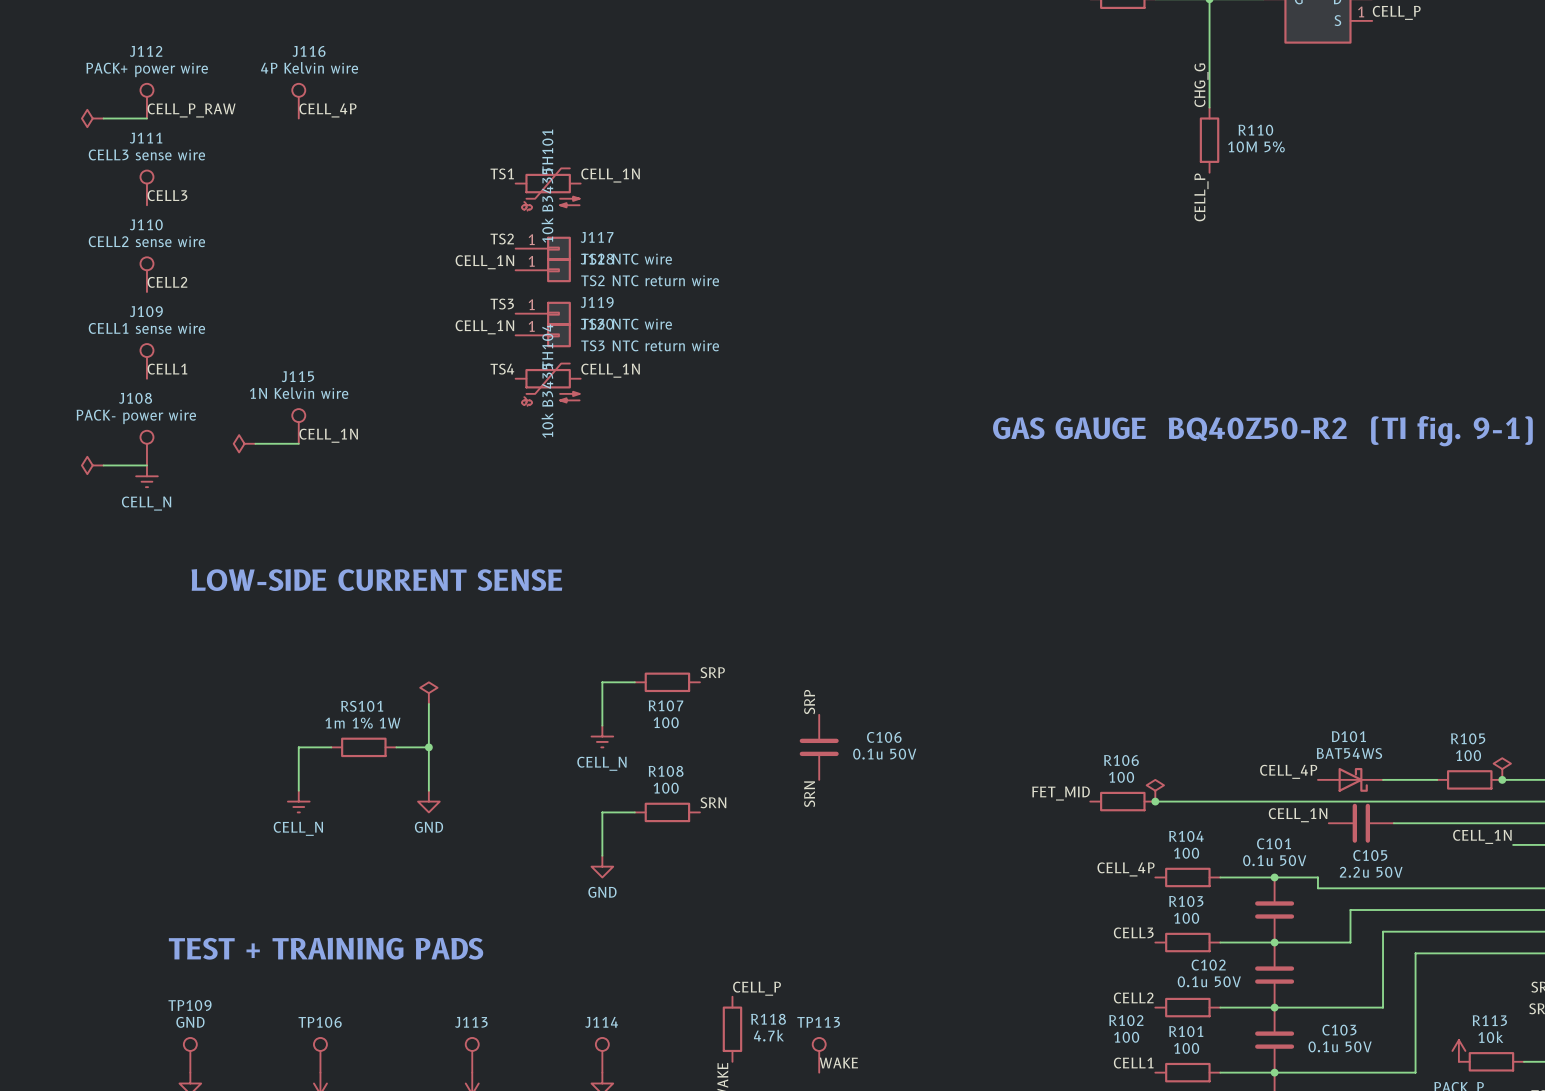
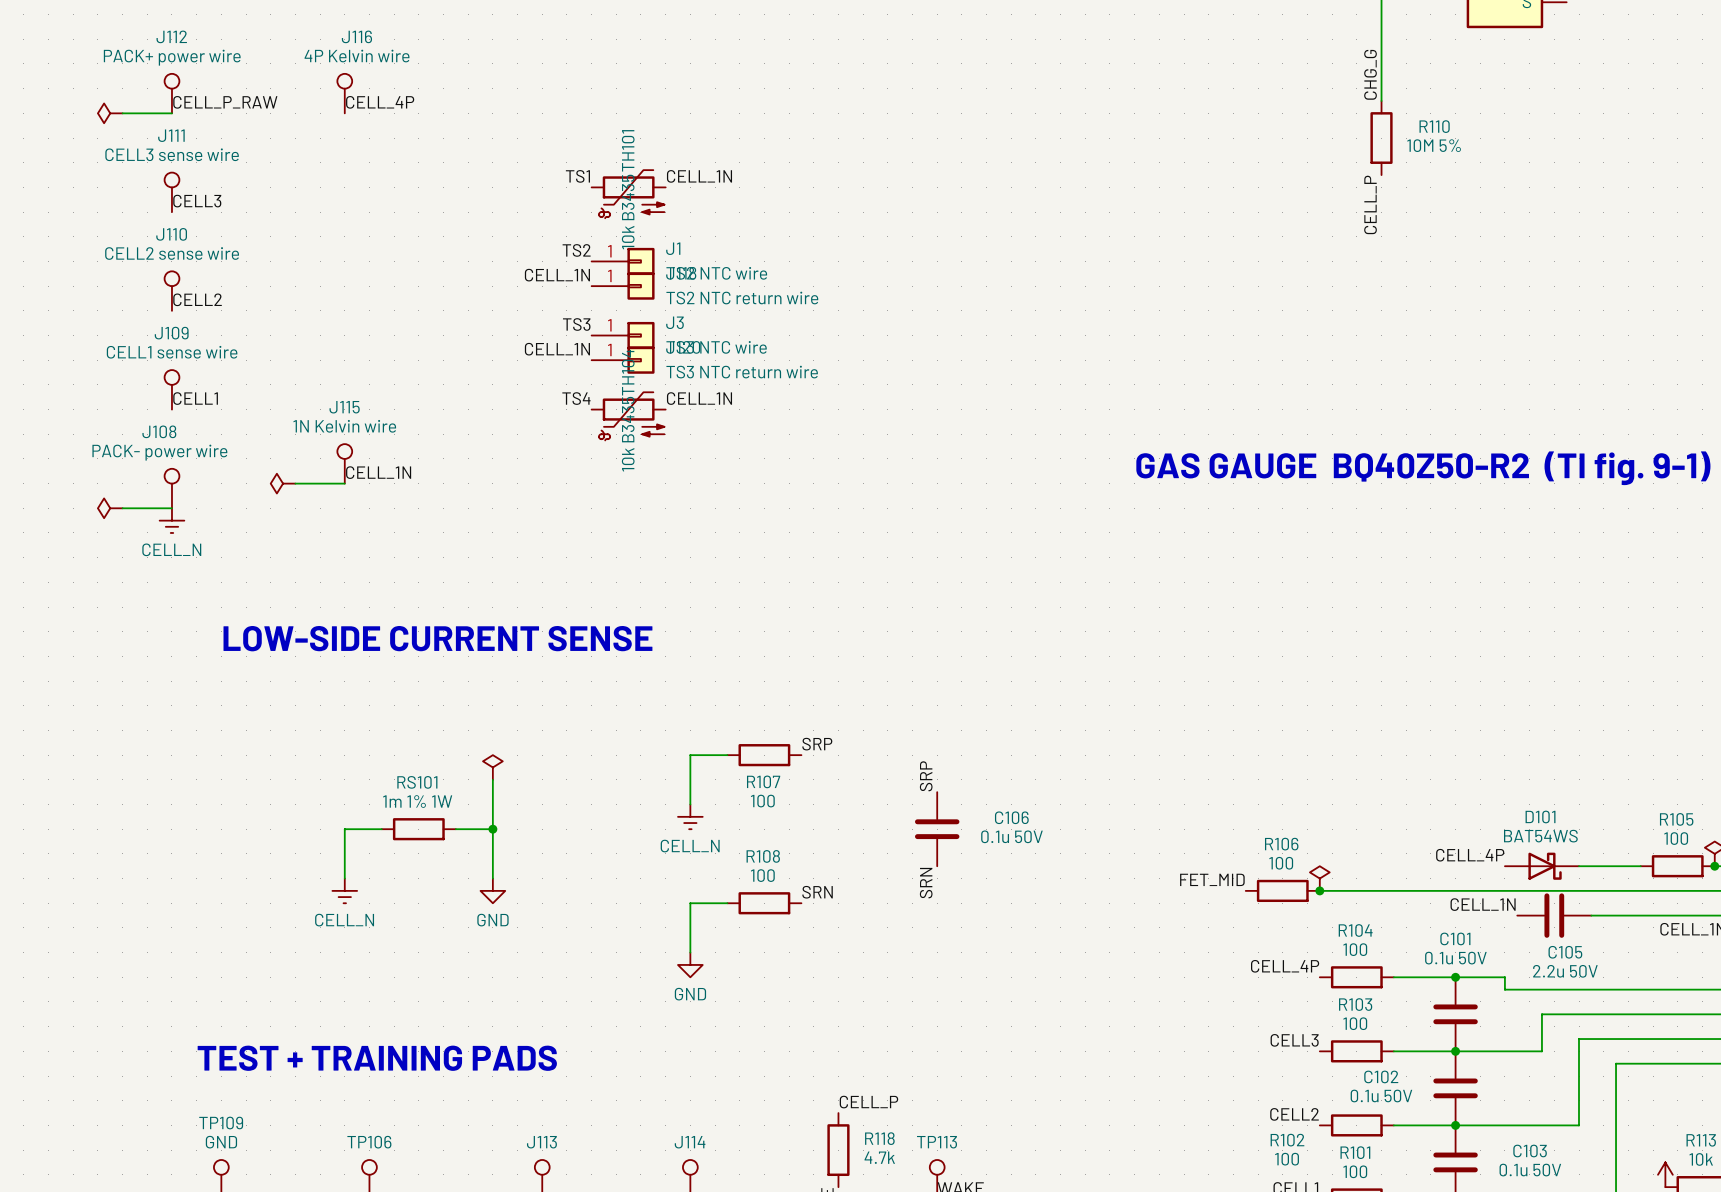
J117 name: J117 (597, 237) -> J1 (673, 248)
J119 name: J119 (597, 302) -> J3 (674, 322)

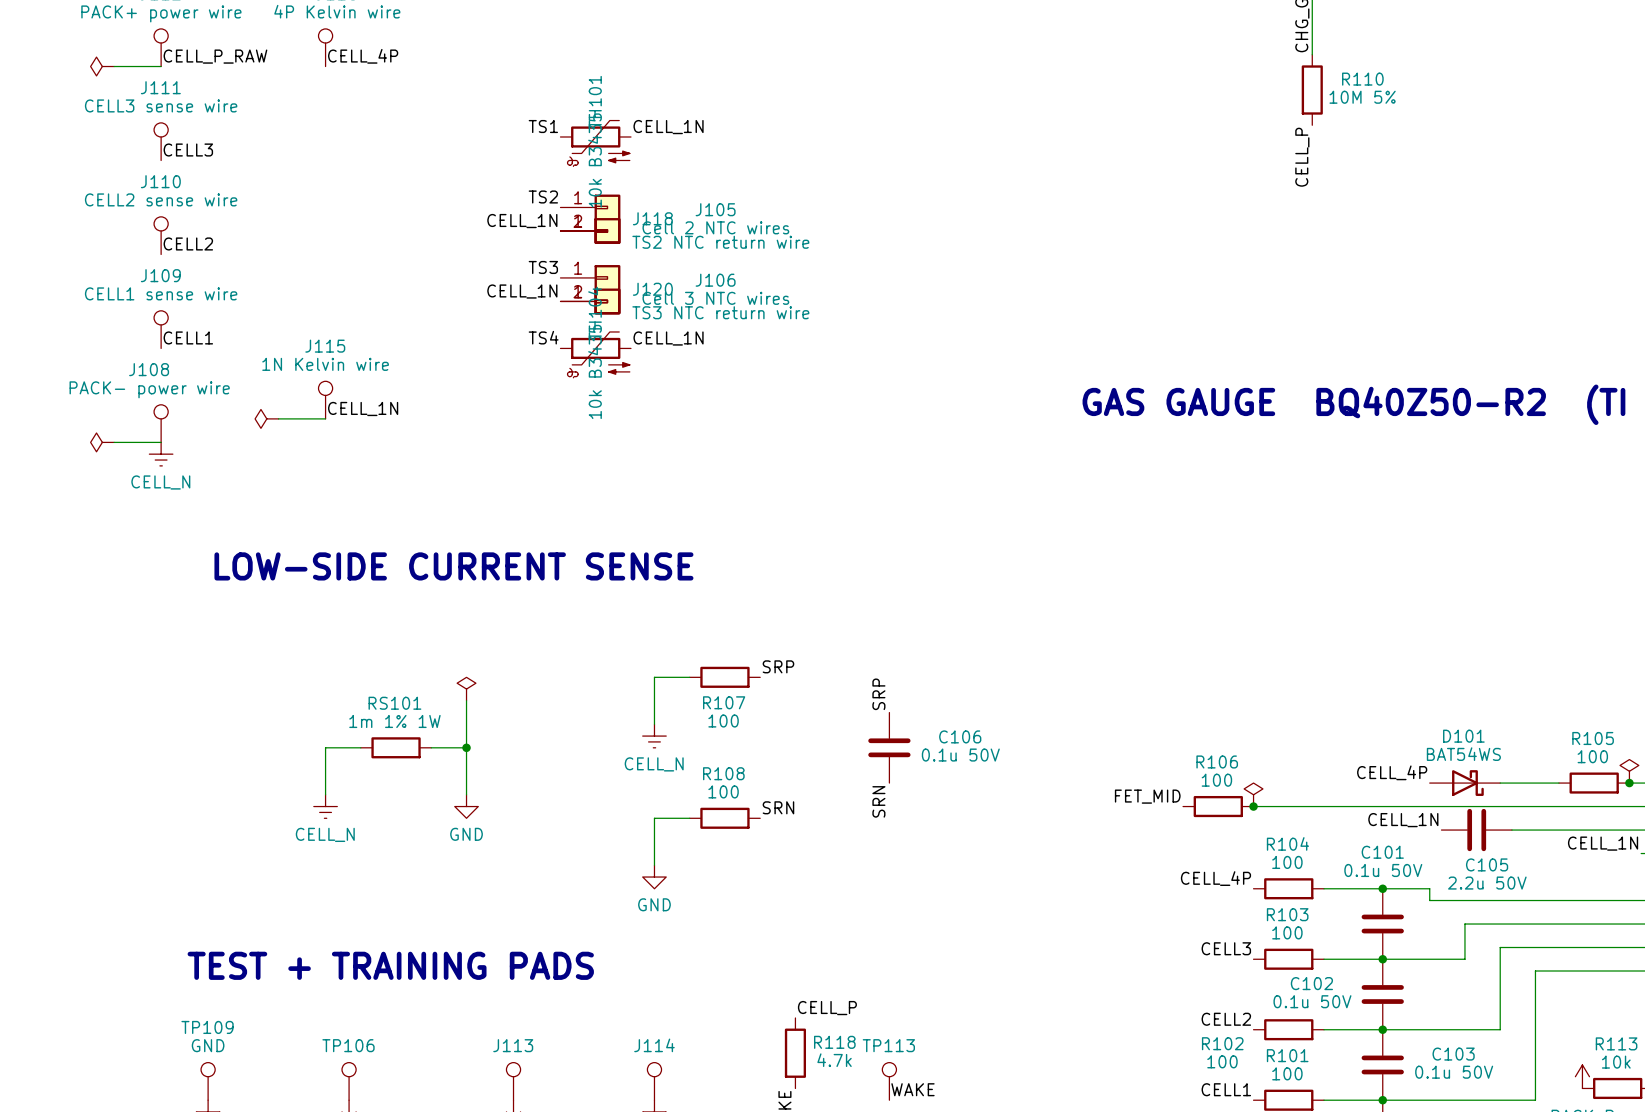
J1: TS2 NTC wire (623, 261) -> none
J105: none -> Cell 2 NTC wires (590, 219)
J3: TS3 NTC wire (623, 335) -> none
J106: none -> Cell 3 NTC wires (590, 289)

